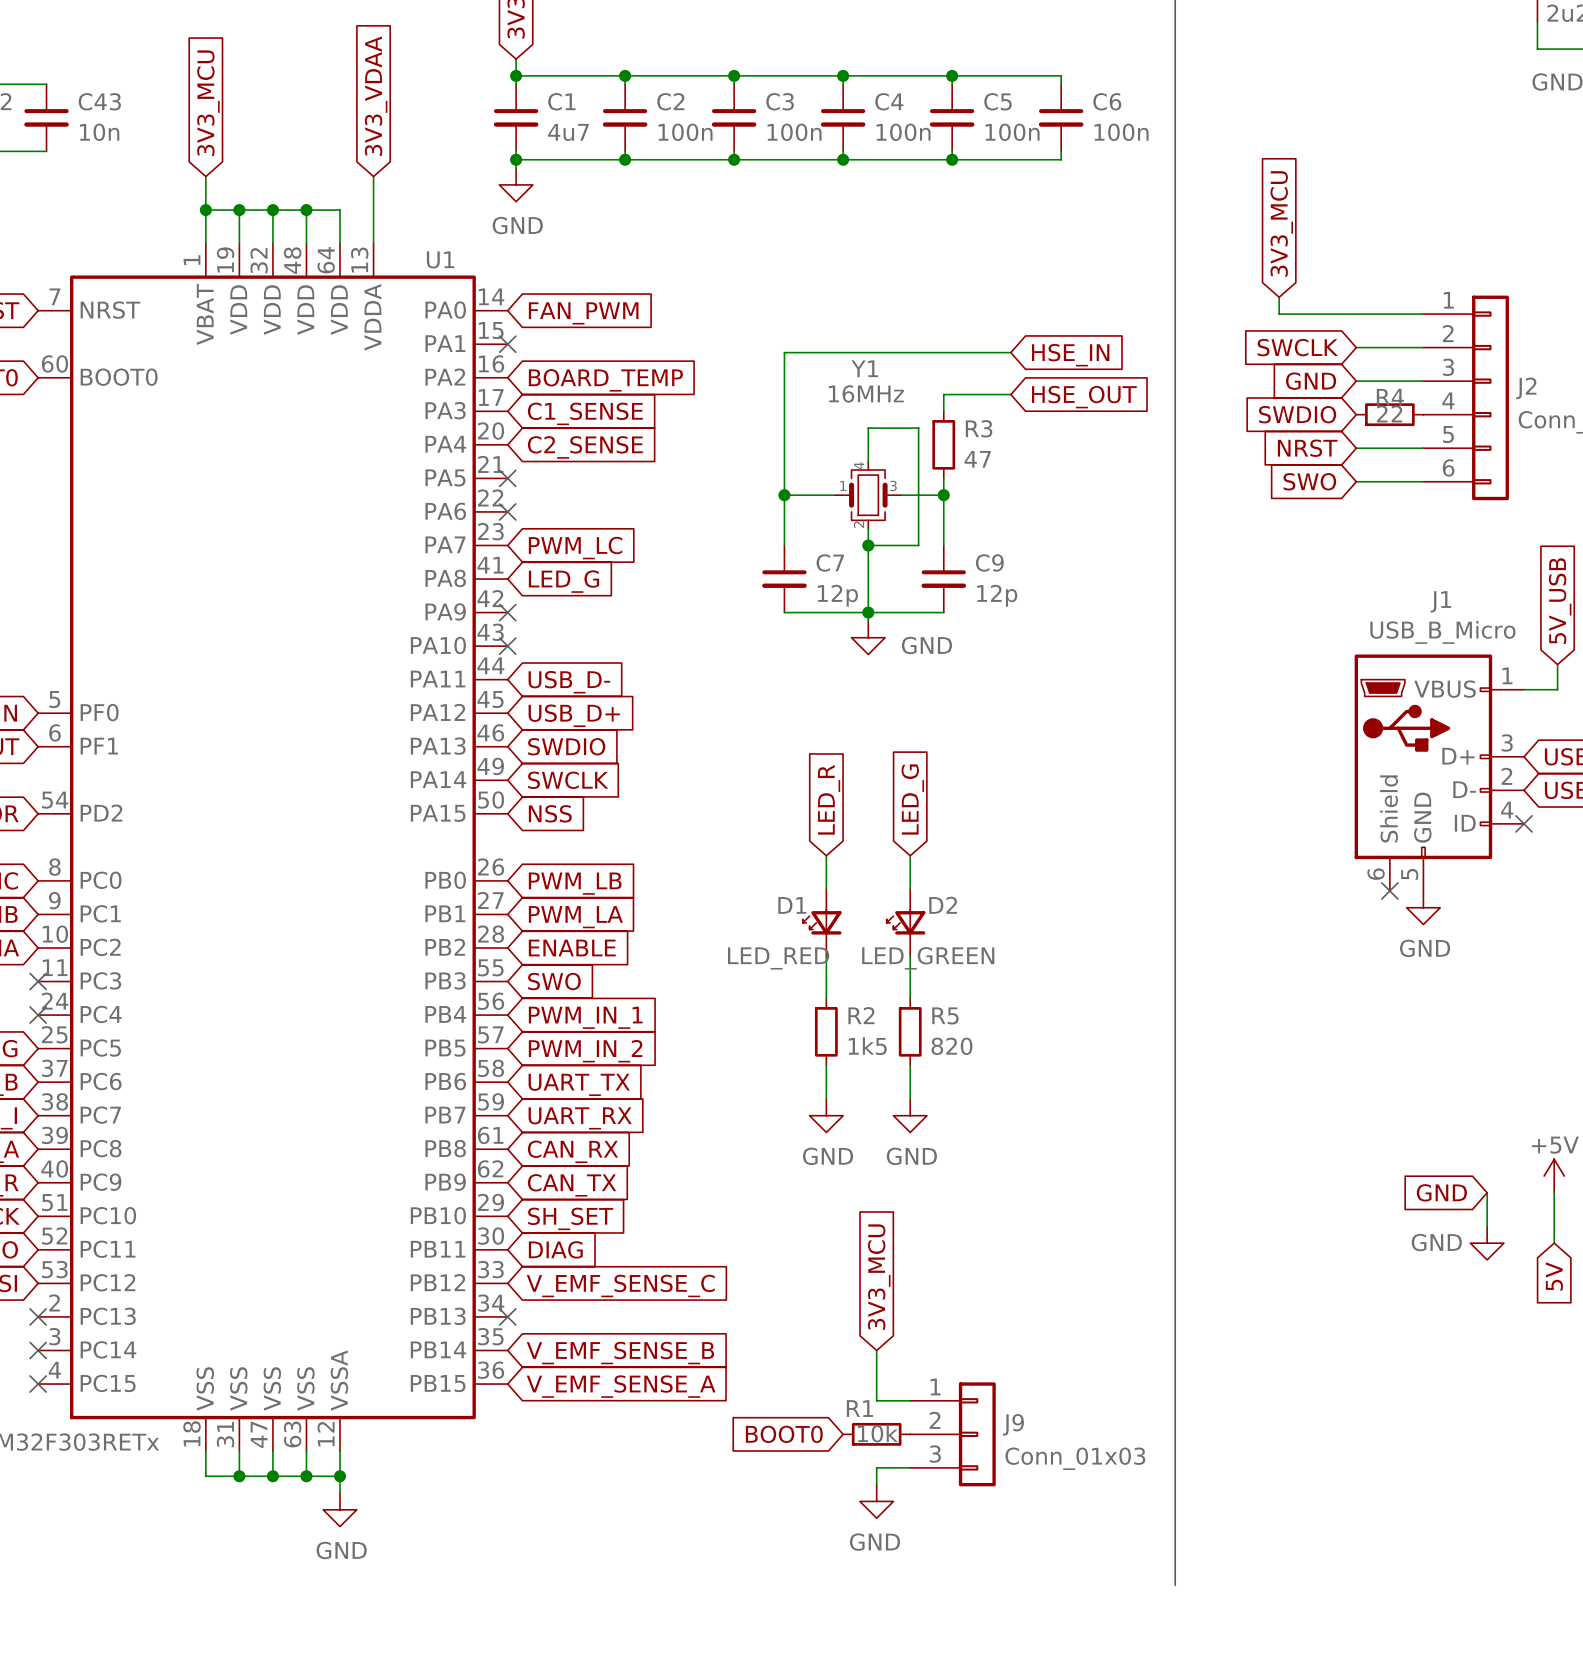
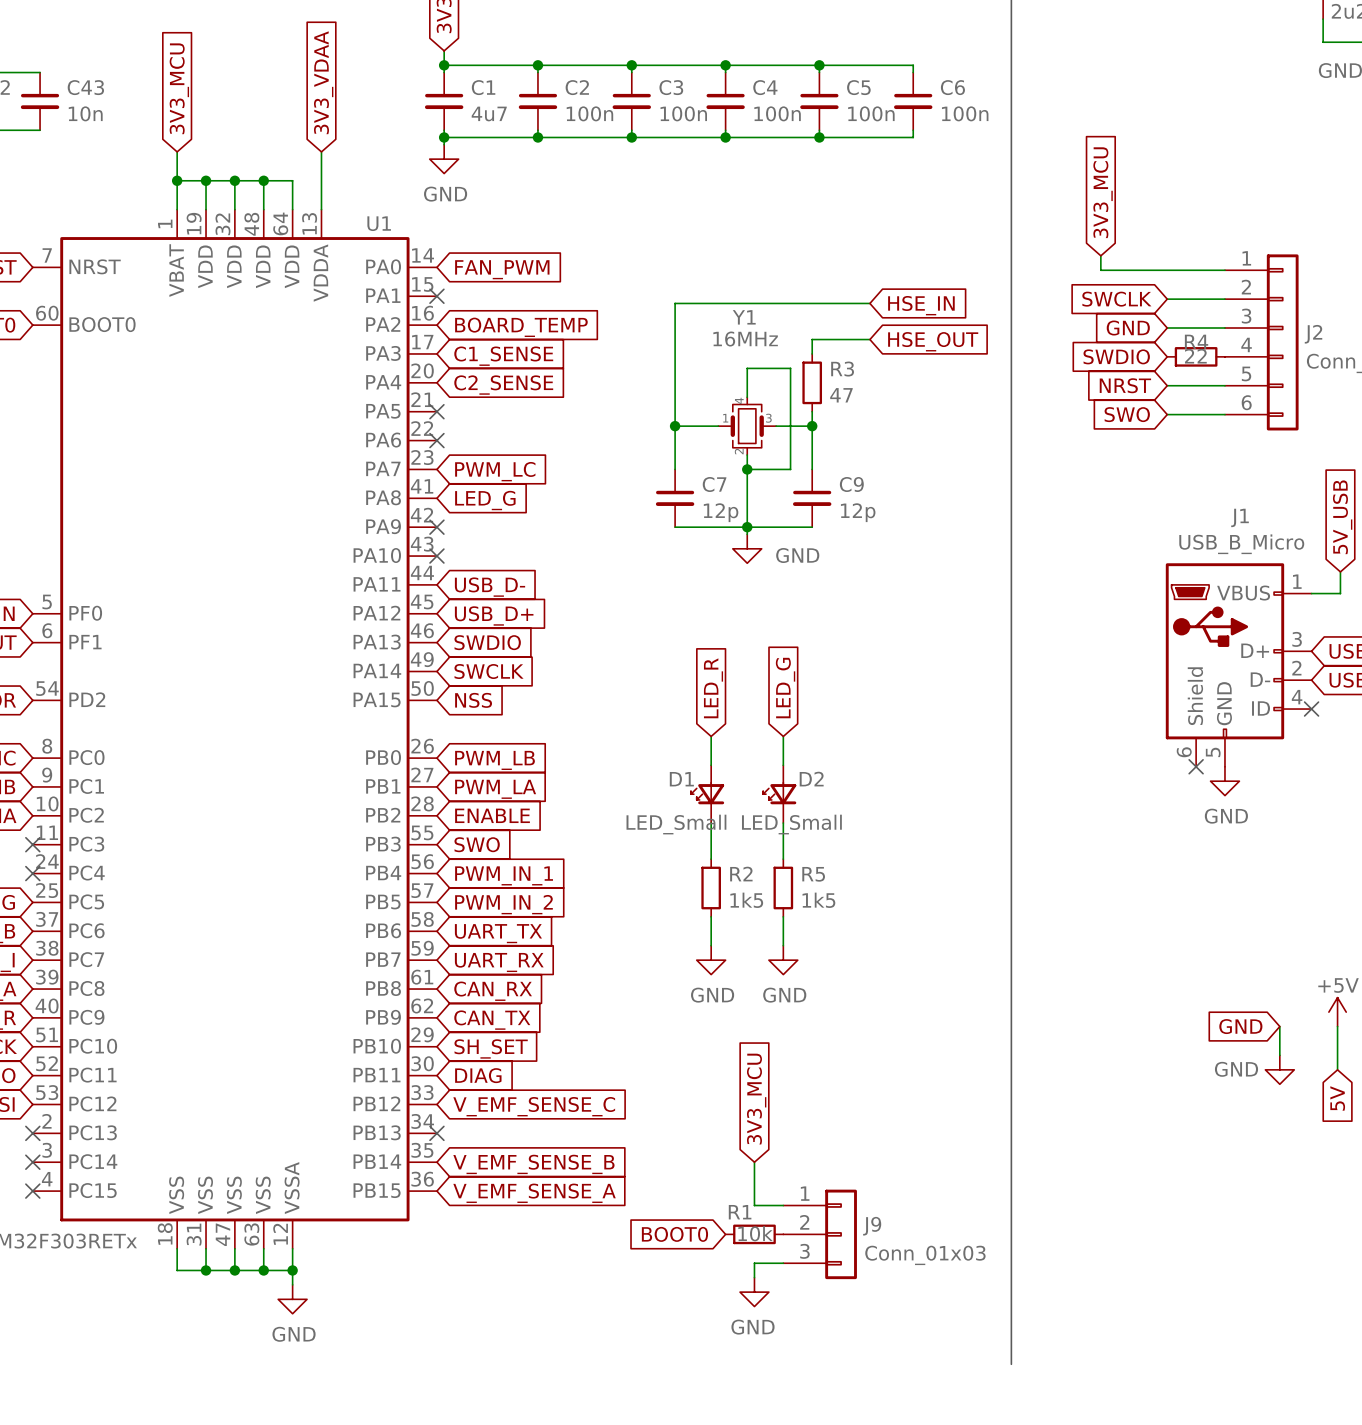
D1 value: LED_RED (778, 958) -> LED_Small (676, 824)
D2 value: LED_GREEN (928, 958) -> LED_Small (791, 824)
R5 value: 820 (951, 1046) -> 1k5 (818, 900)

